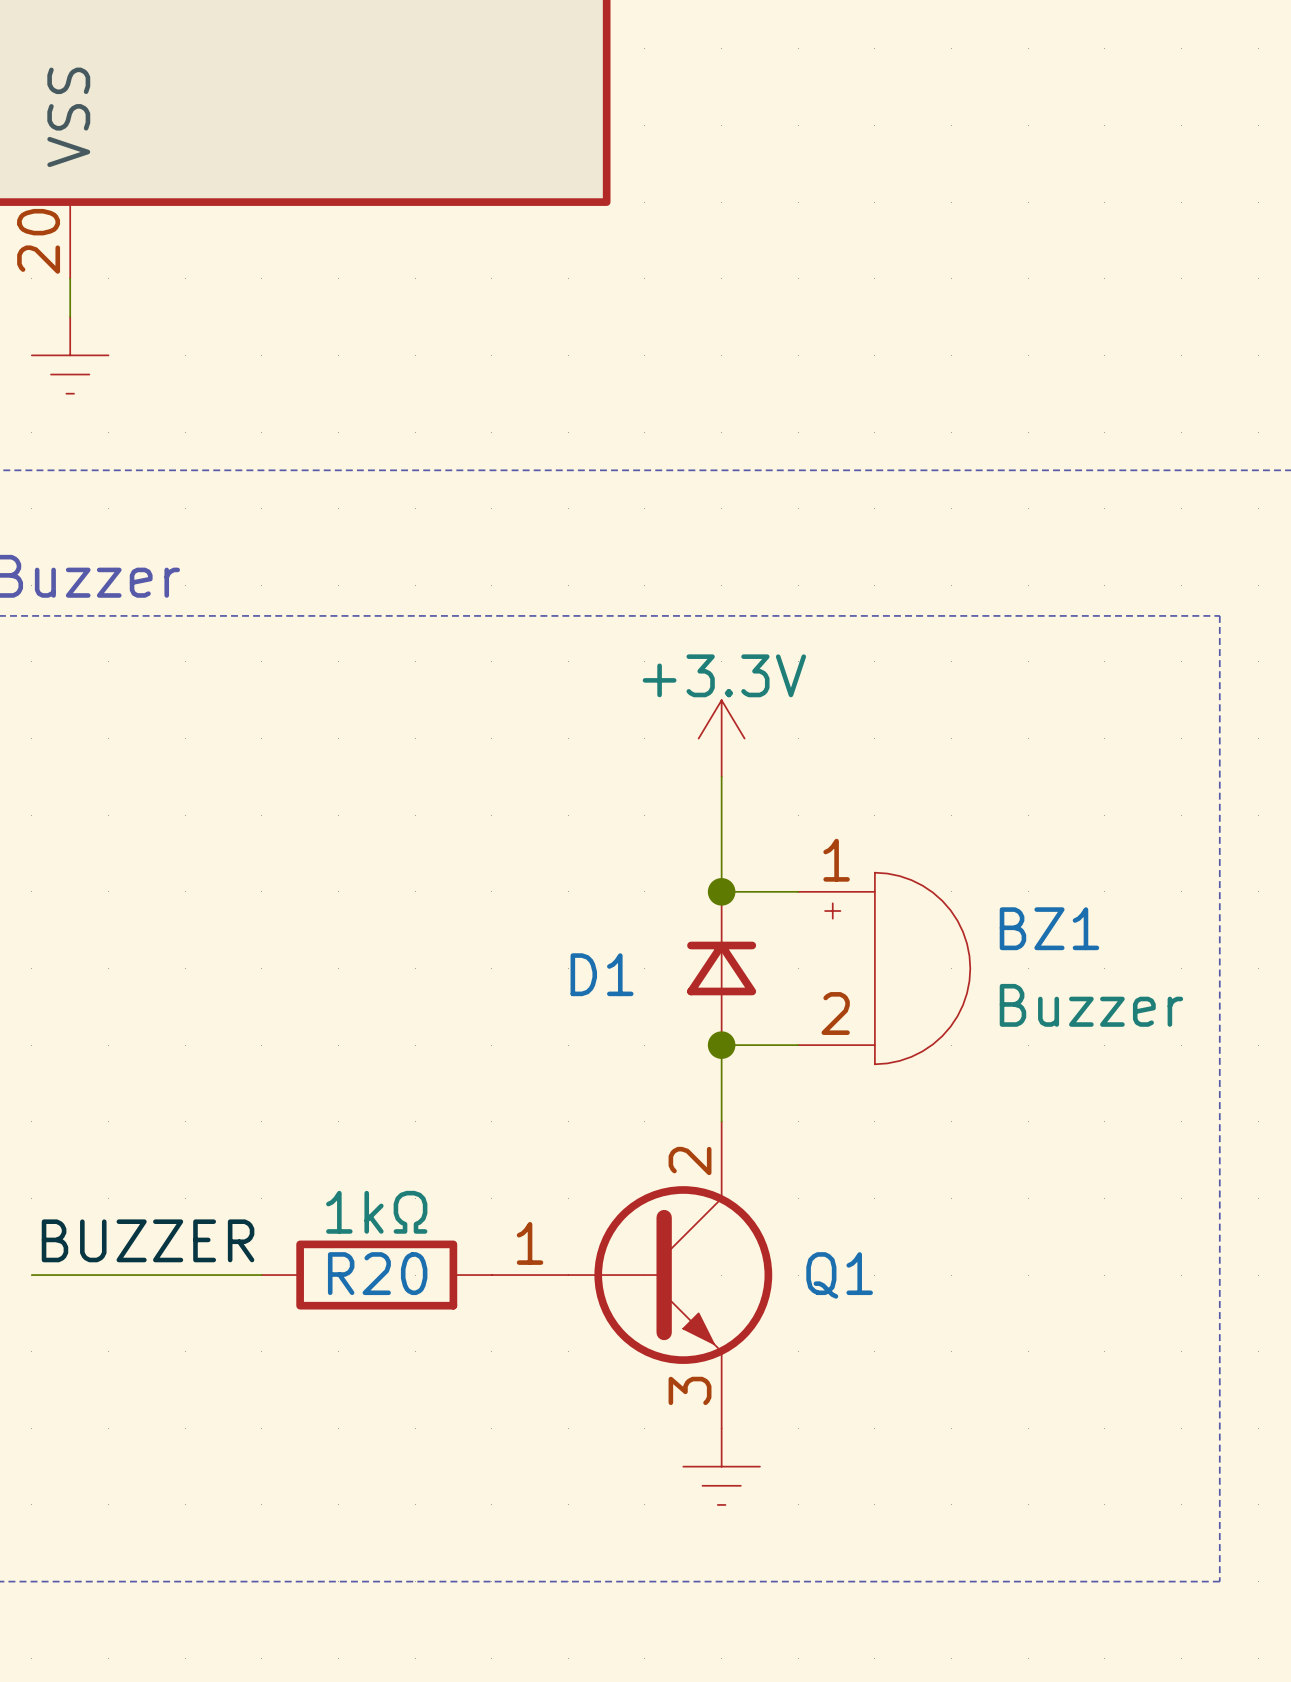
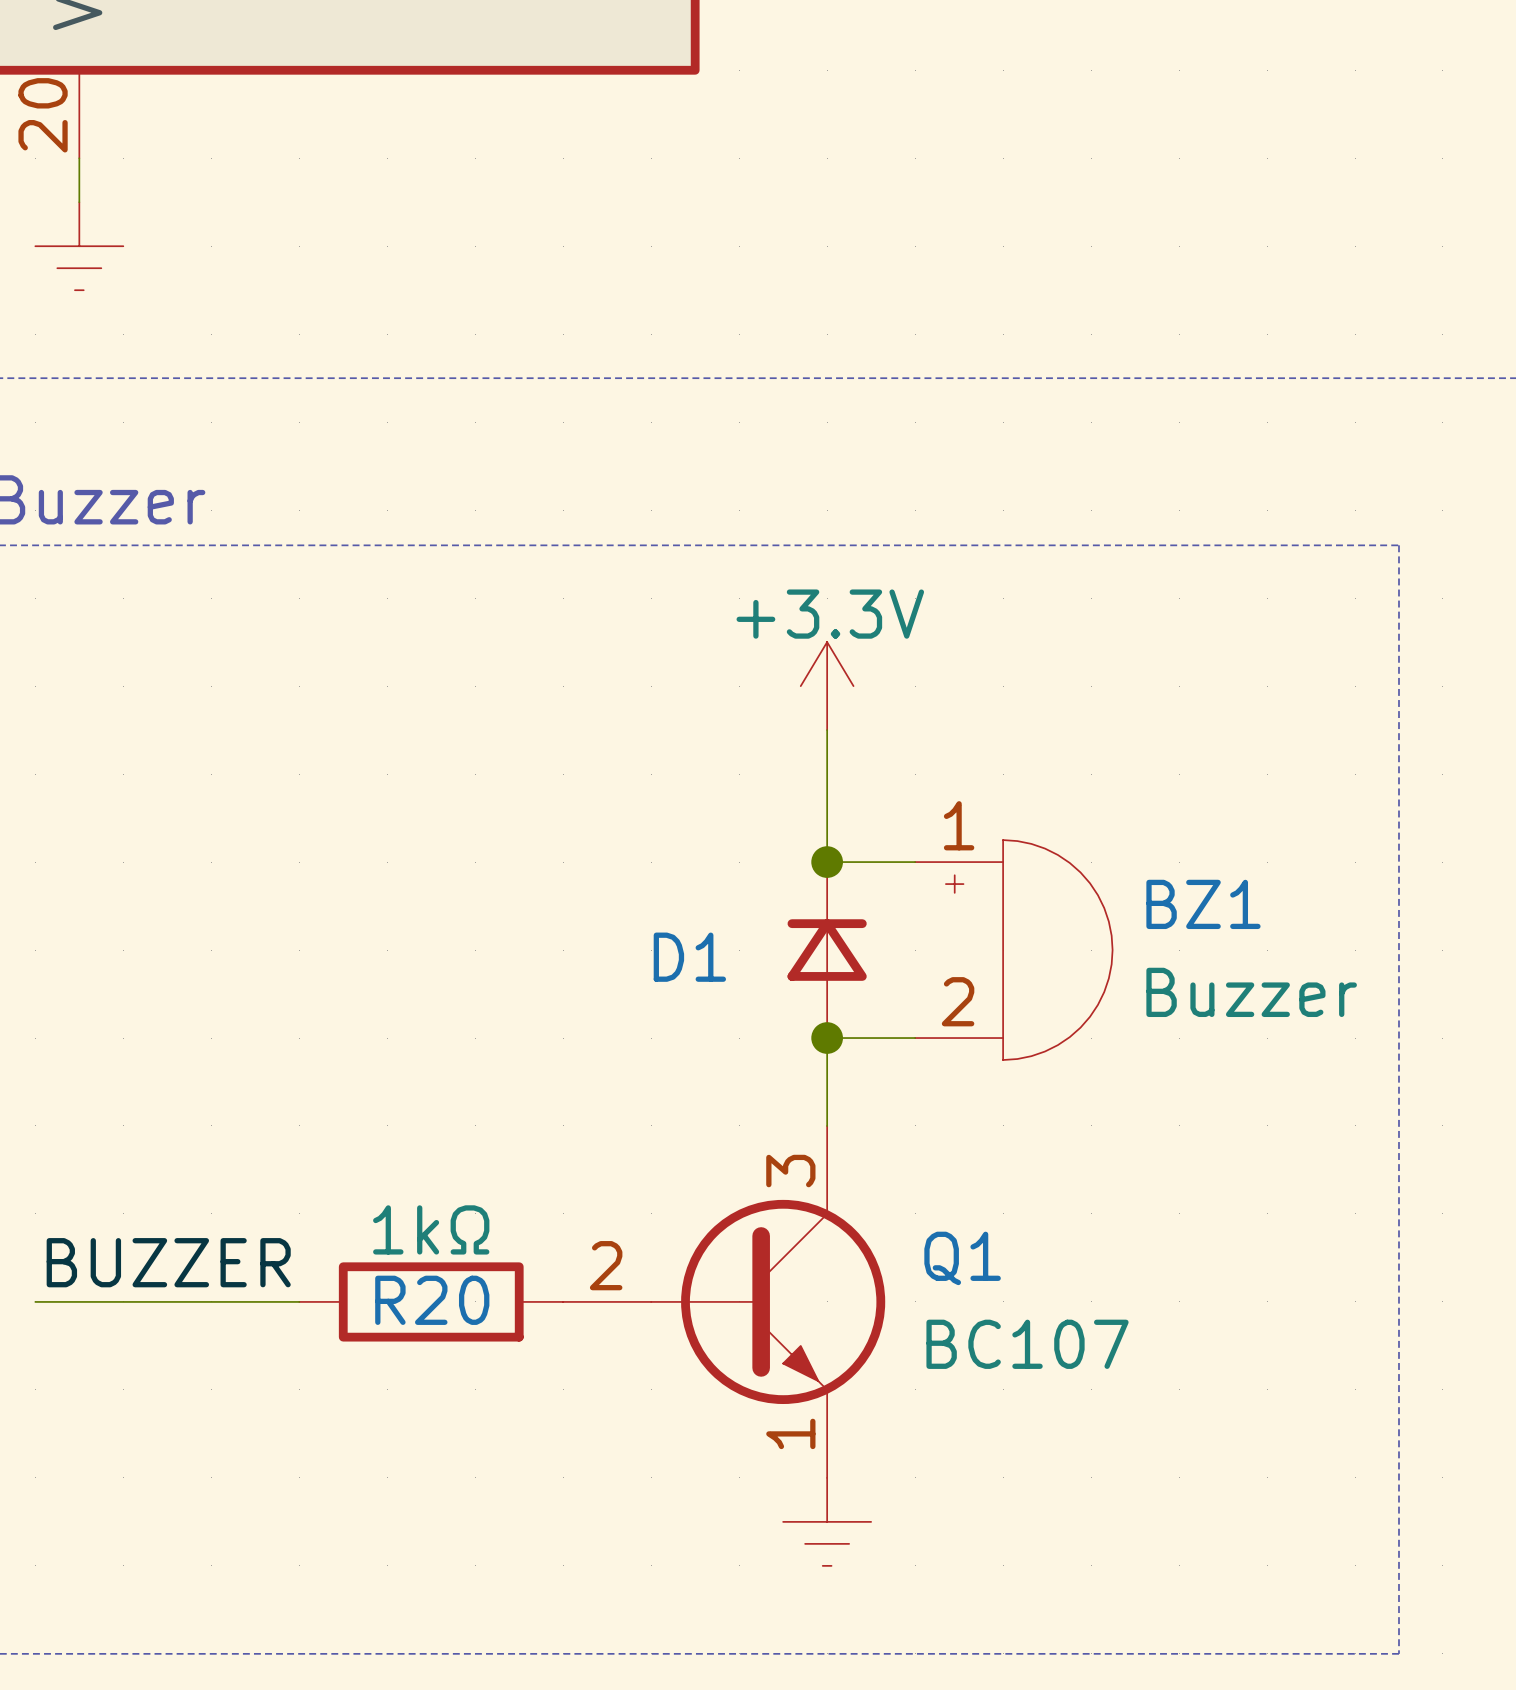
Q1 pin number: 2 (690, 1160) -> 3 (790, 1171)
Q1 pin number: 1 (530, 1243) -> 2 (606, 1265)
Q1 name position: Q1 (839, 1275) -> Q1 (962, 1258)
Q1 value: none -> BC107 (1027, 1344)
Q1 pin number: 3 (690, 1390) -> 1 (790, 1433)

